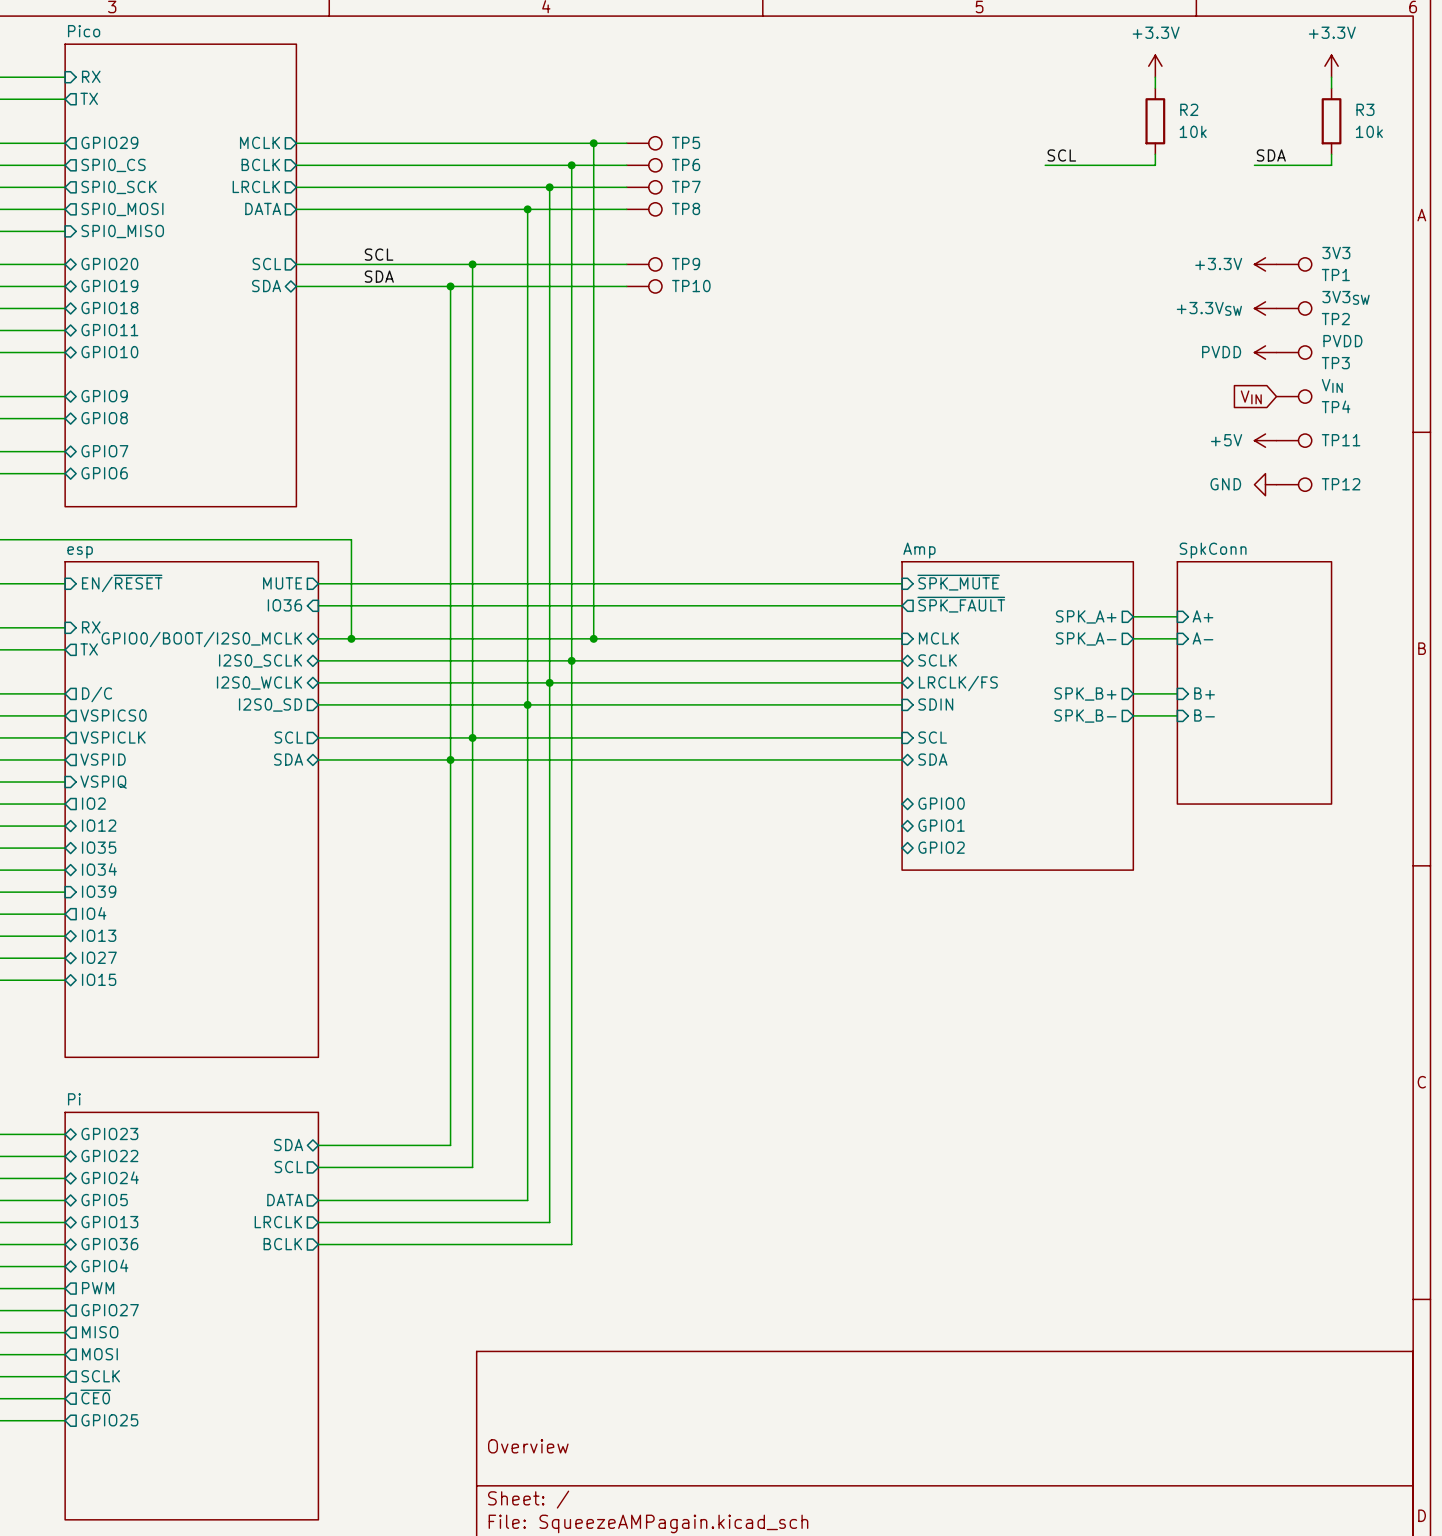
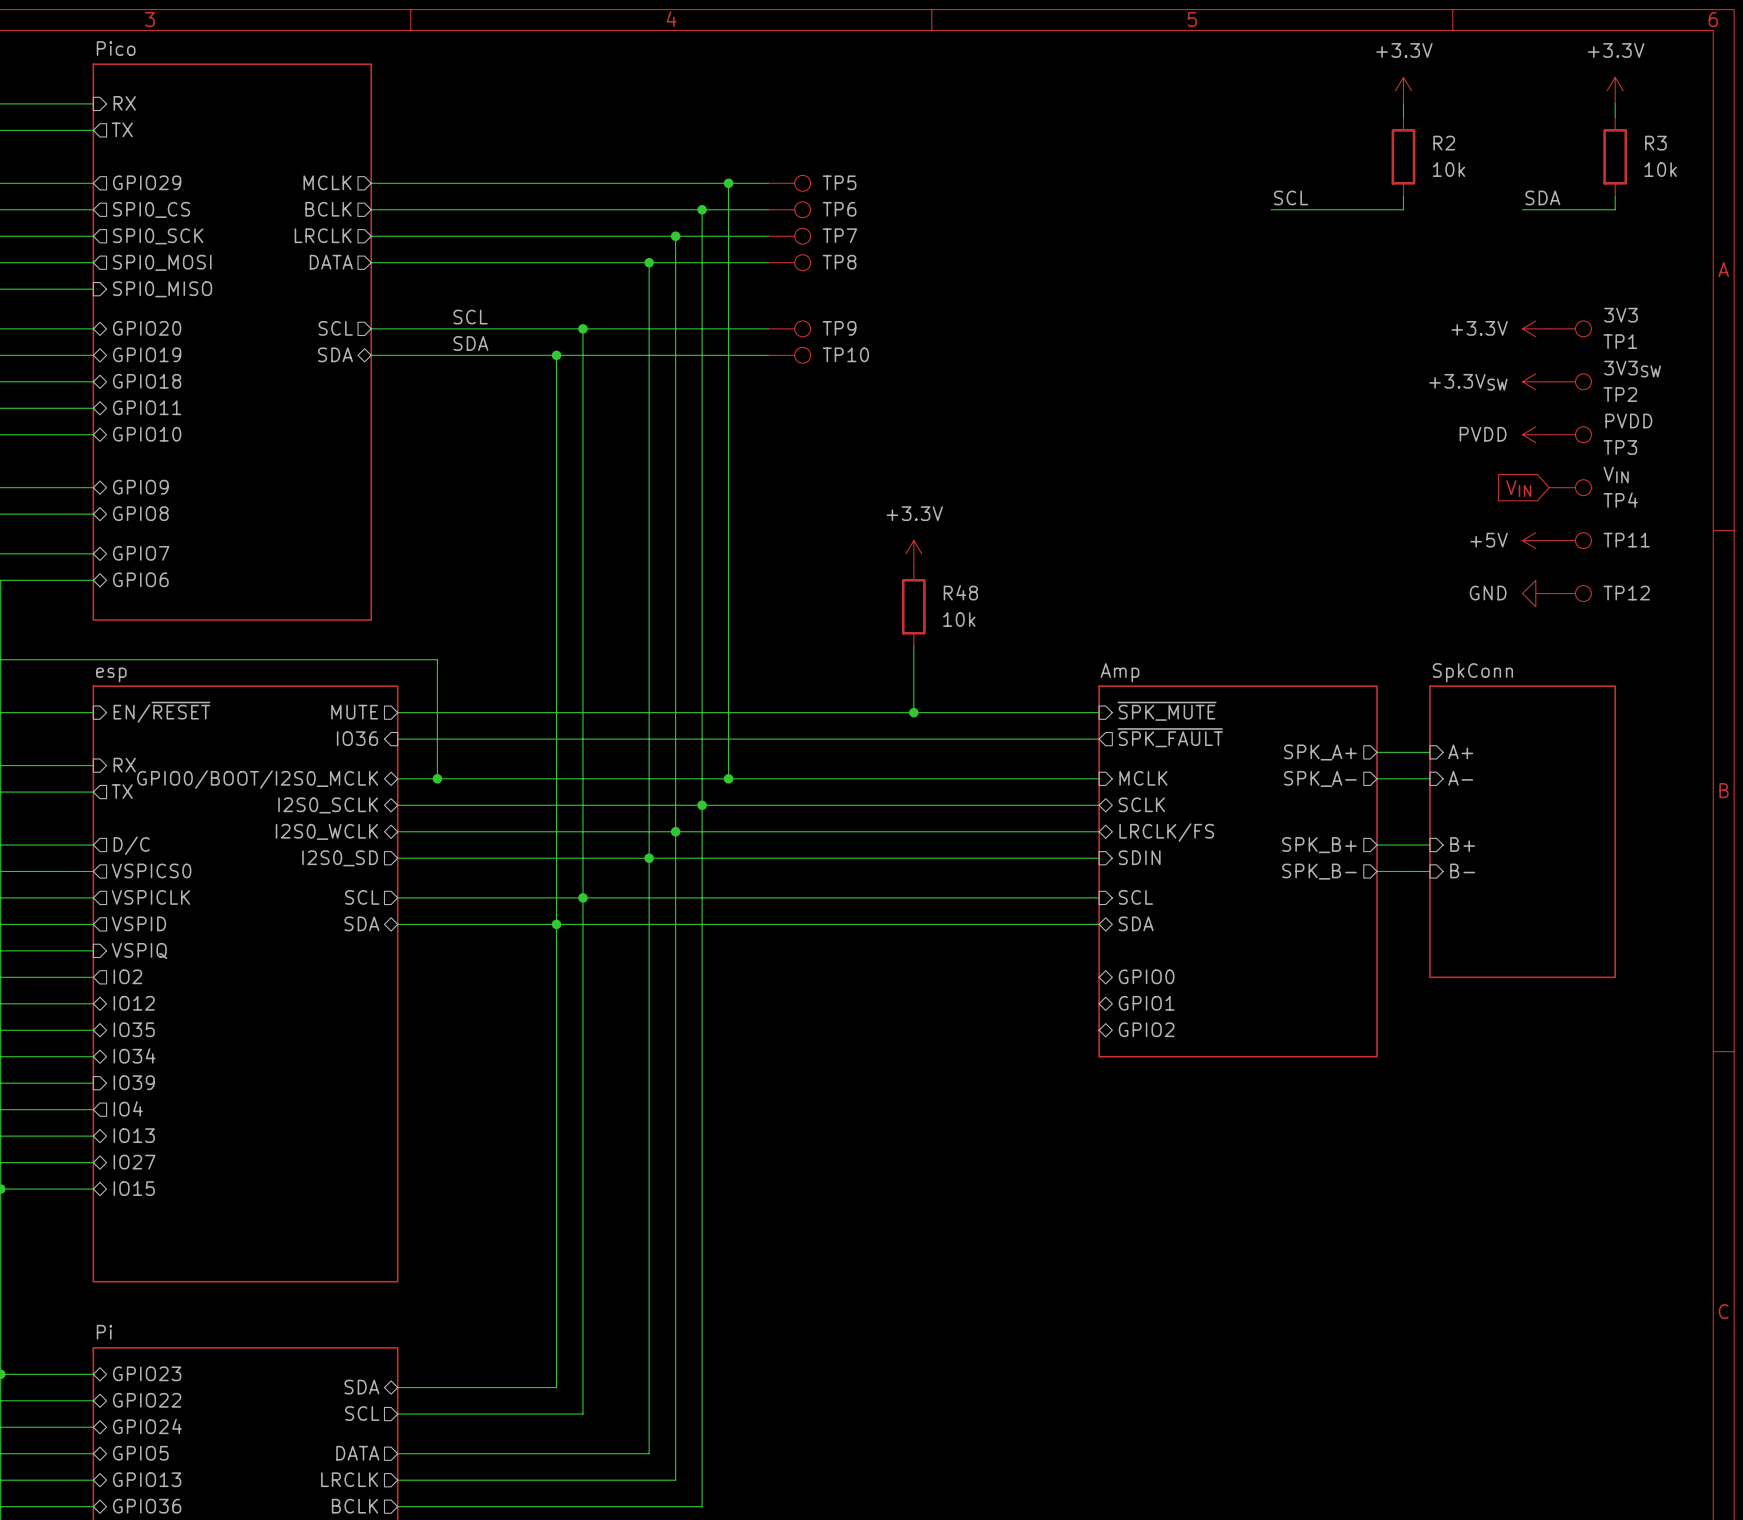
power symbol: none -> +3.3V (913, 553)
R48: none -> 10k (913, 606)
wire: none -> (913, 646) (913, 712)
junction: none -> (913, 712)

